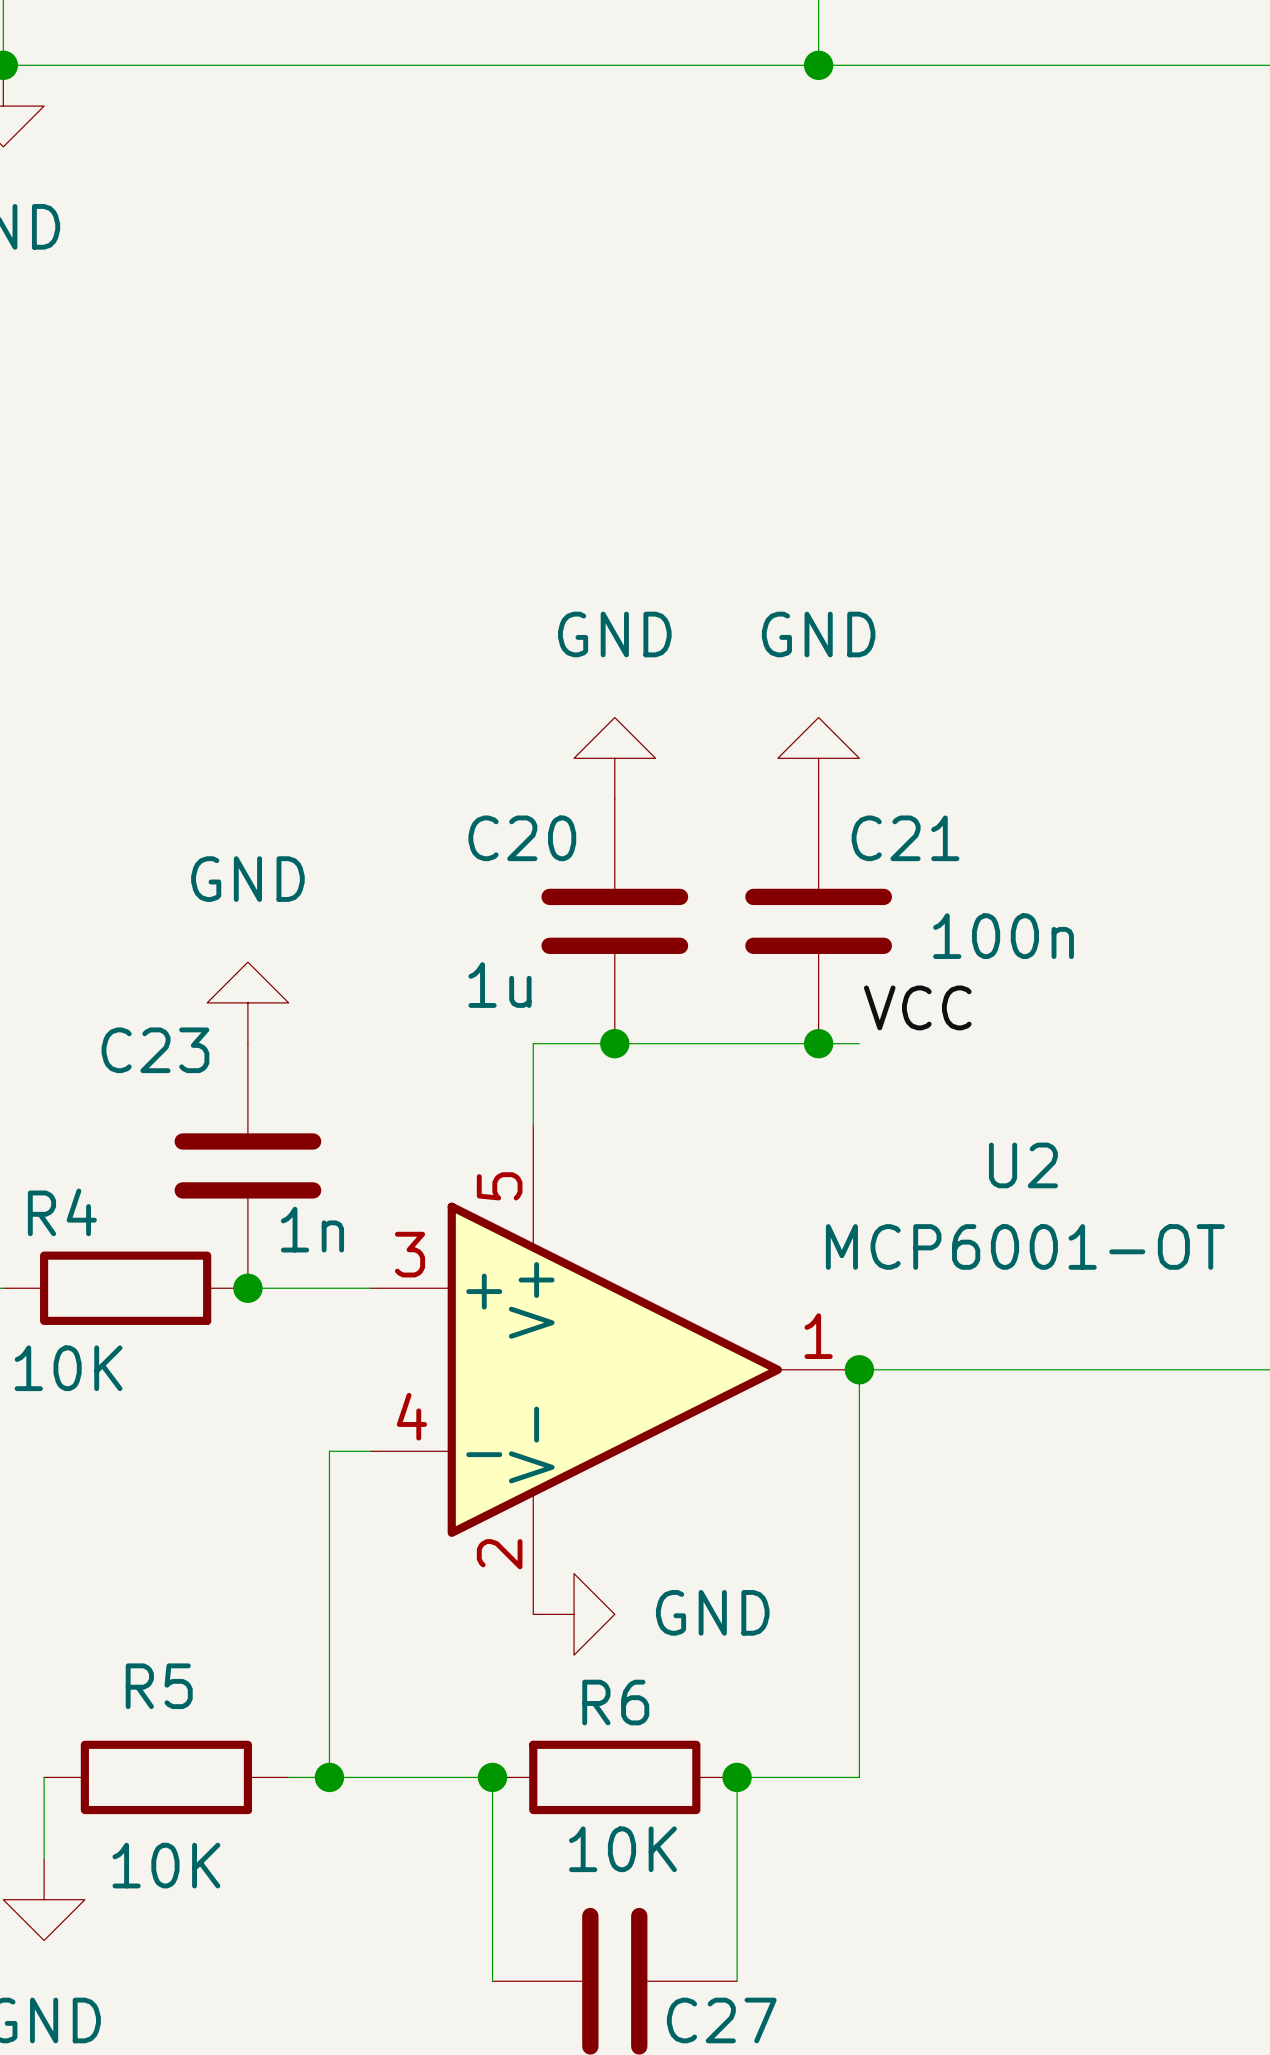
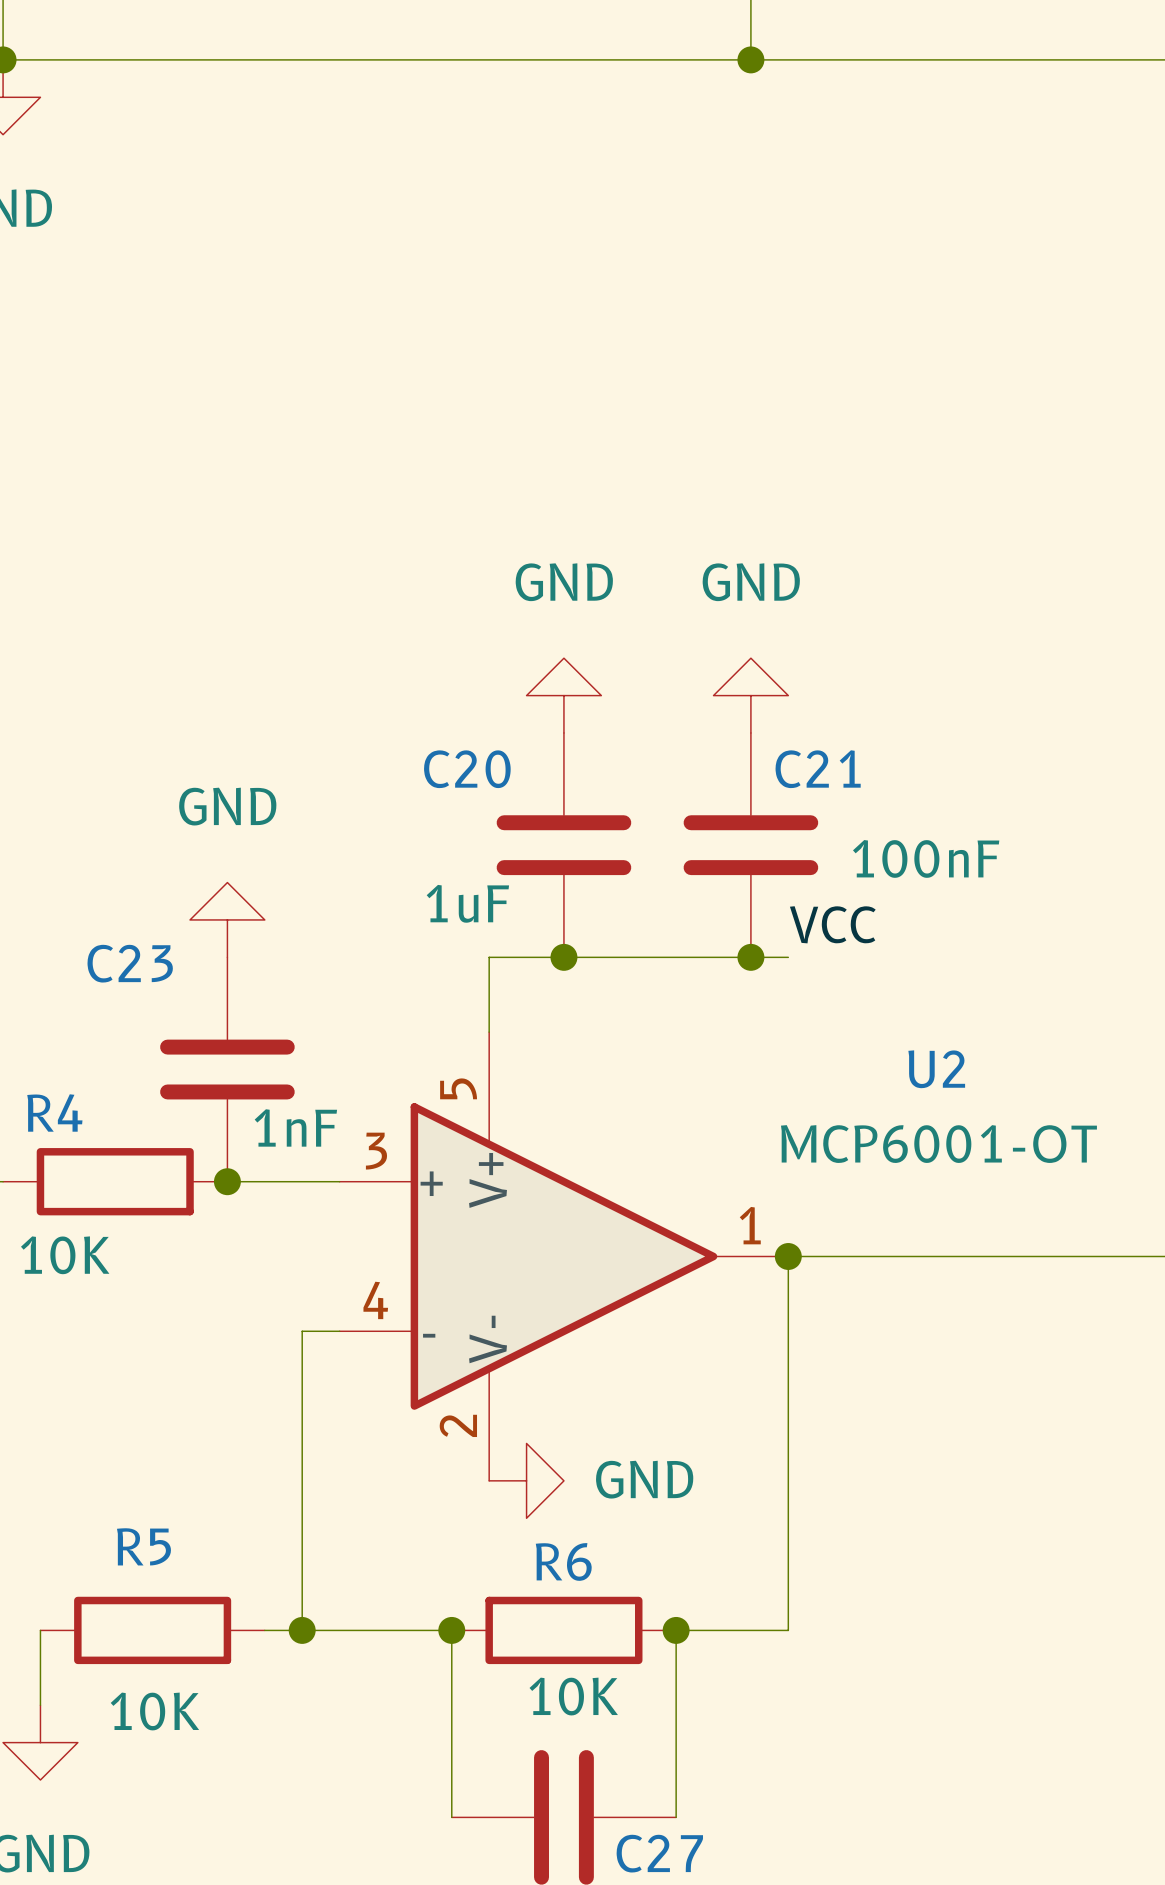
C21 value: 100n (1003, 936) -> 100nF (926, 858)
C20 value: 1u (500, 985) -> 1uF (467, 903)
C23 value: 1n (312, 1229) -> 1nF (295, 1127)

